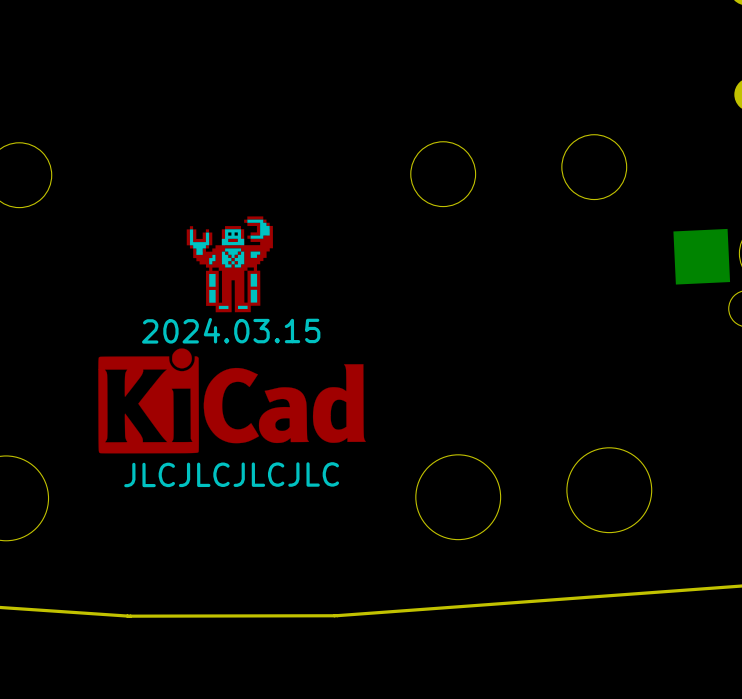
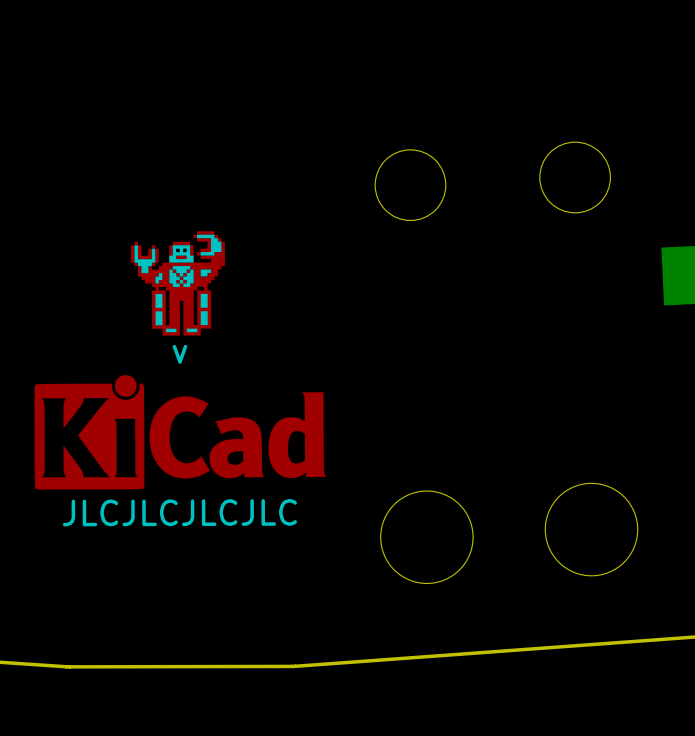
text: 2024.03.15 (231, 330) -> v (179, 354)

